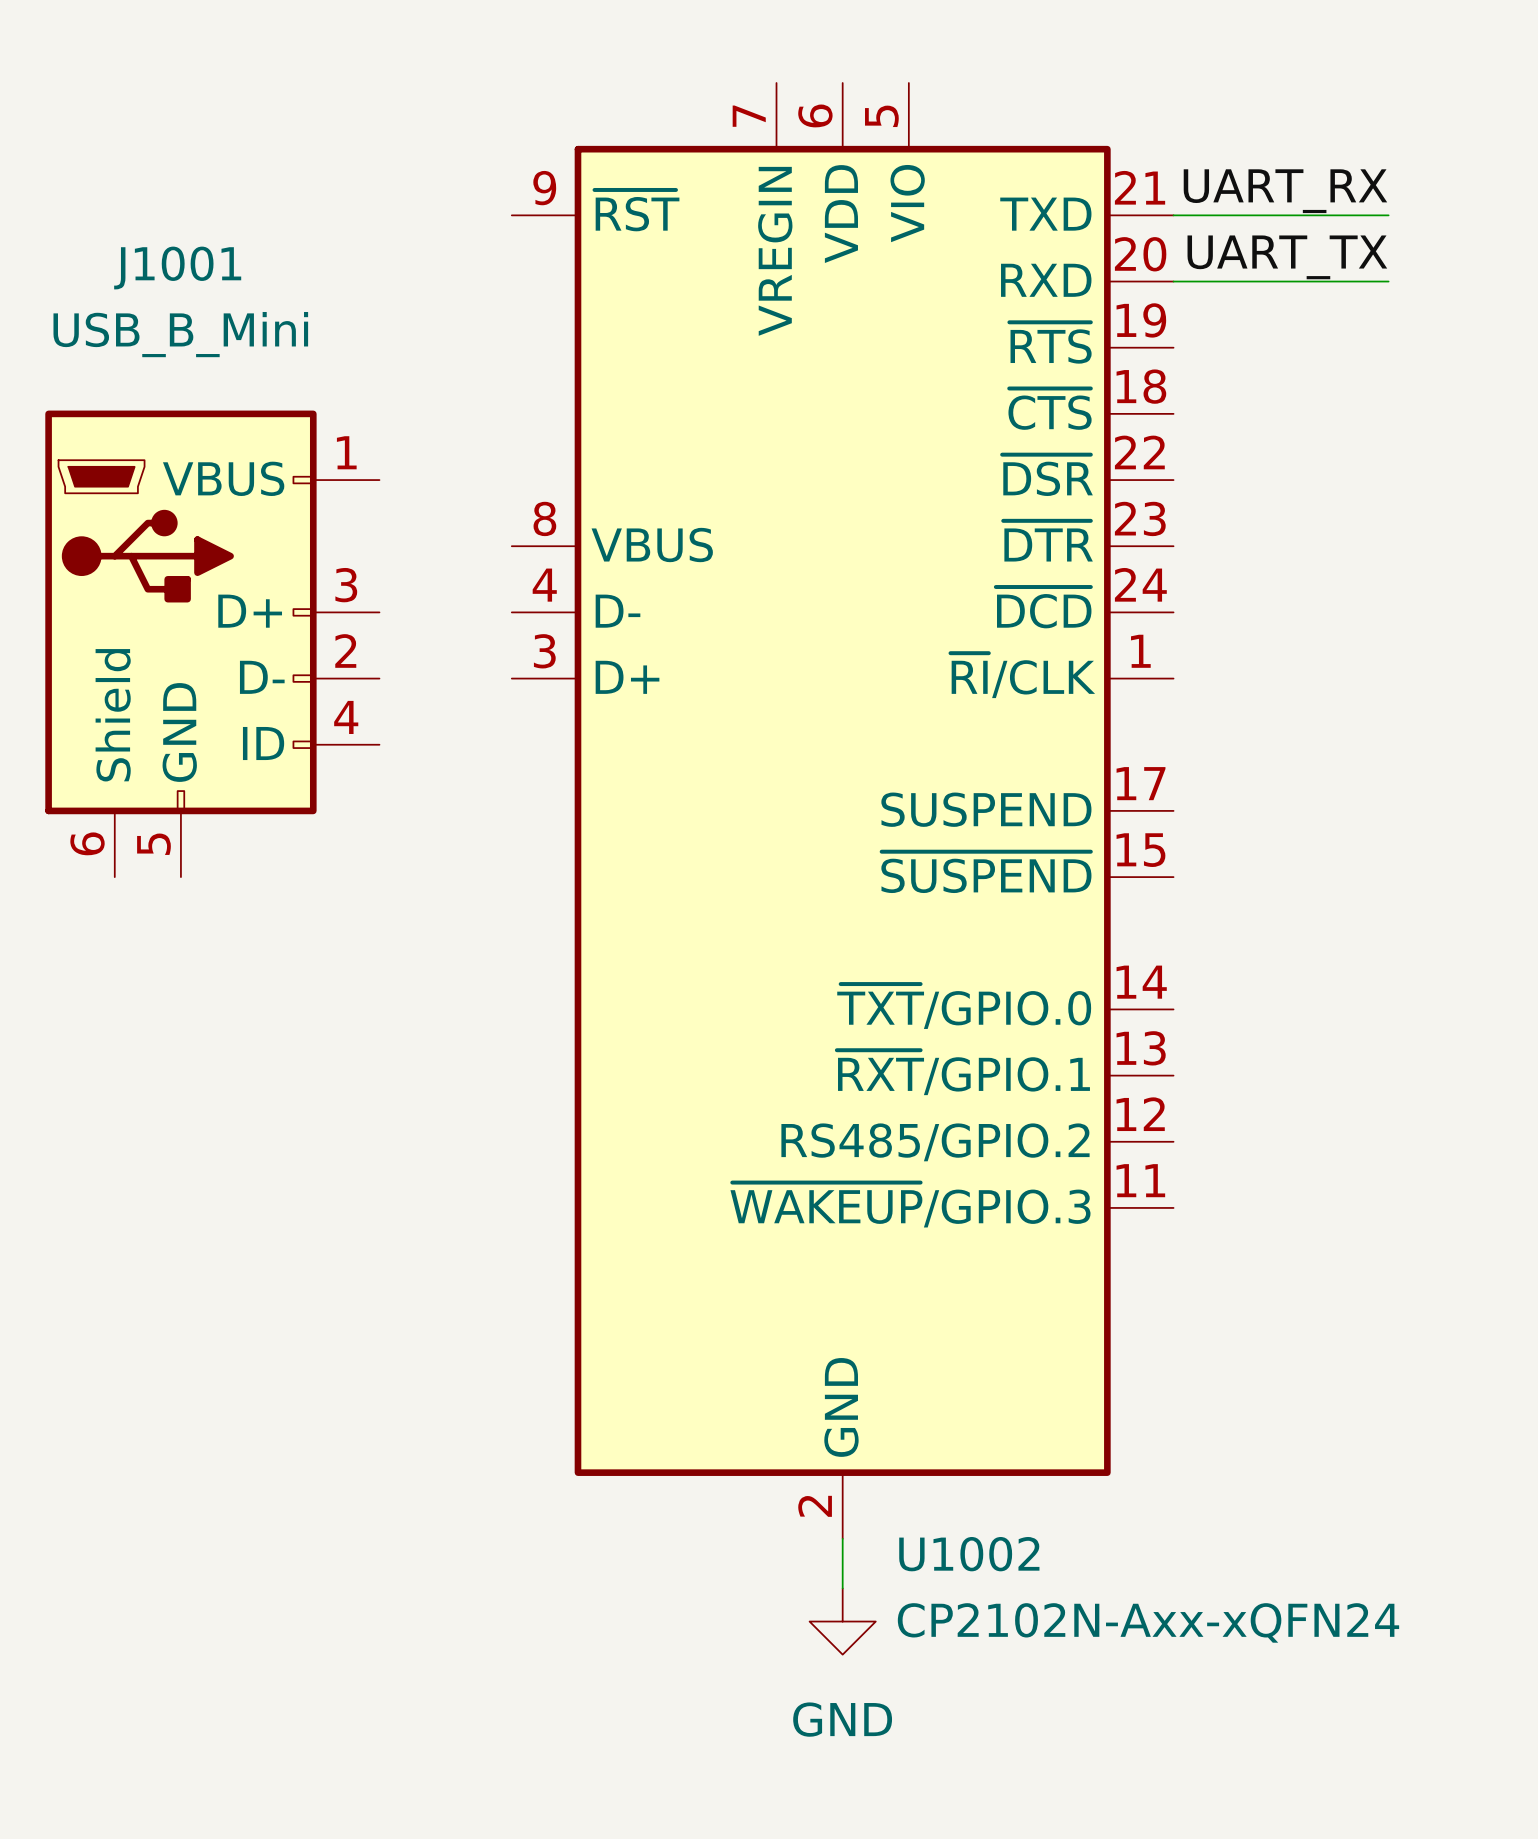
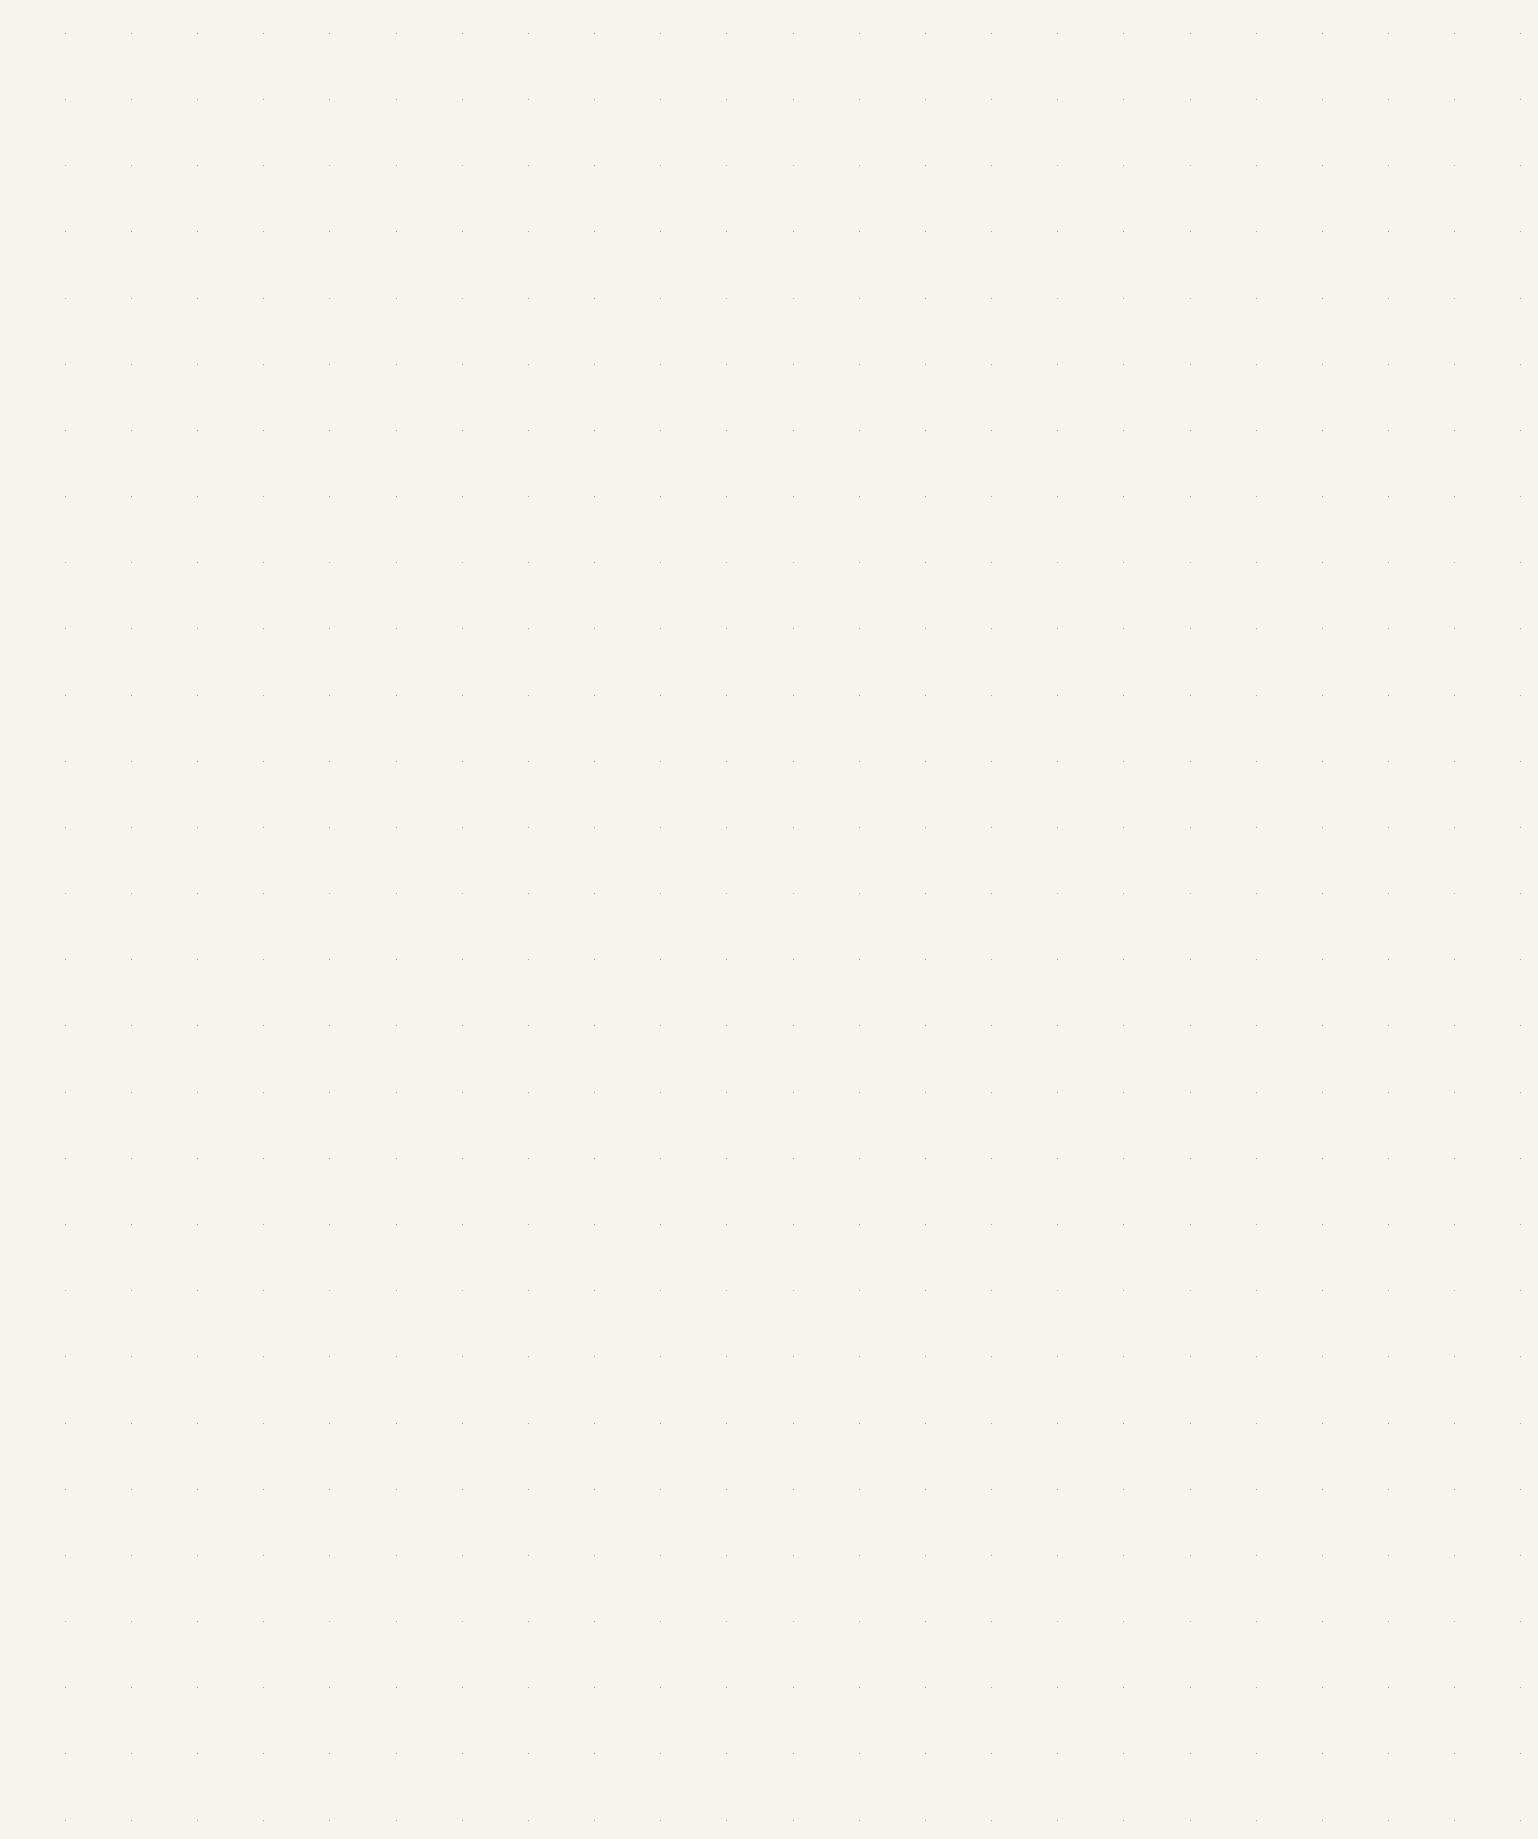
label: UART_RX (1285, 191) -> none
wire: (1173, 215) (1388, 215) -> none
label: UART_TX (1287, 257) -> none
wire: (1173, 281) (1388, 281) -> none
J1001: USB_B_Mini (212, 643) -> none
U1002: CP2102N-Axx-xQFN24 (842, 810) -> none
wire: (842, 1538) (842, 1588) -> none
power symbol: GND (842, 1621) -> none

